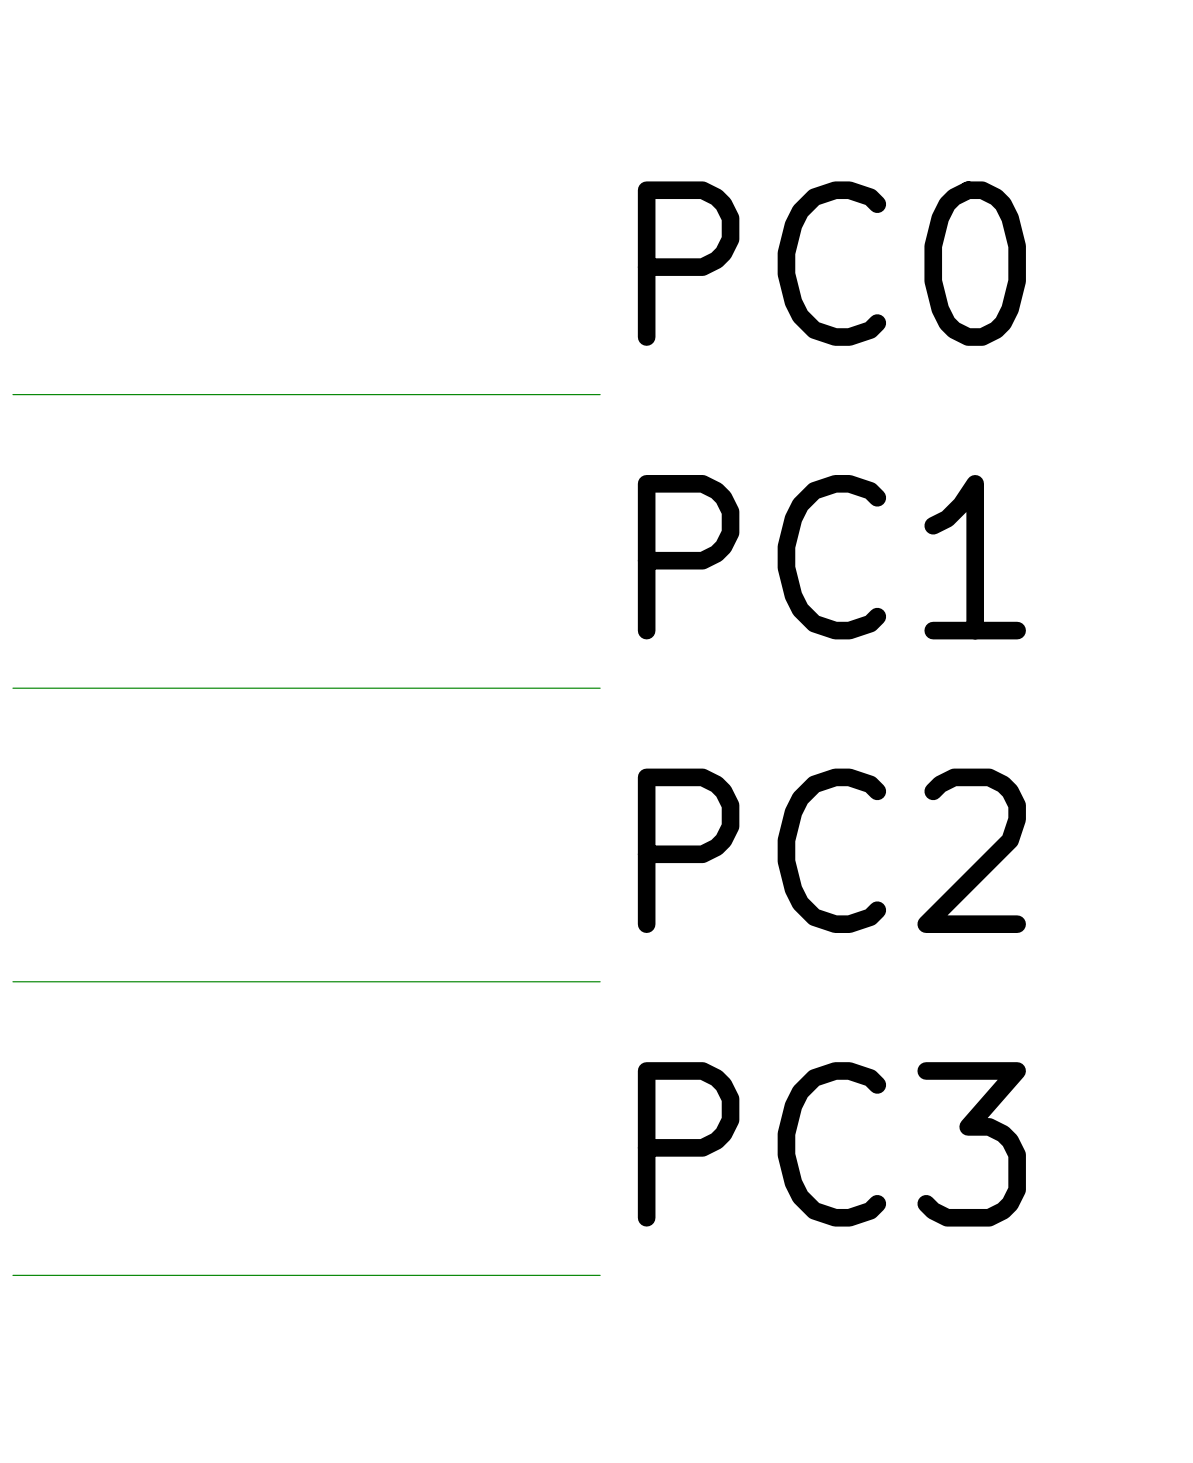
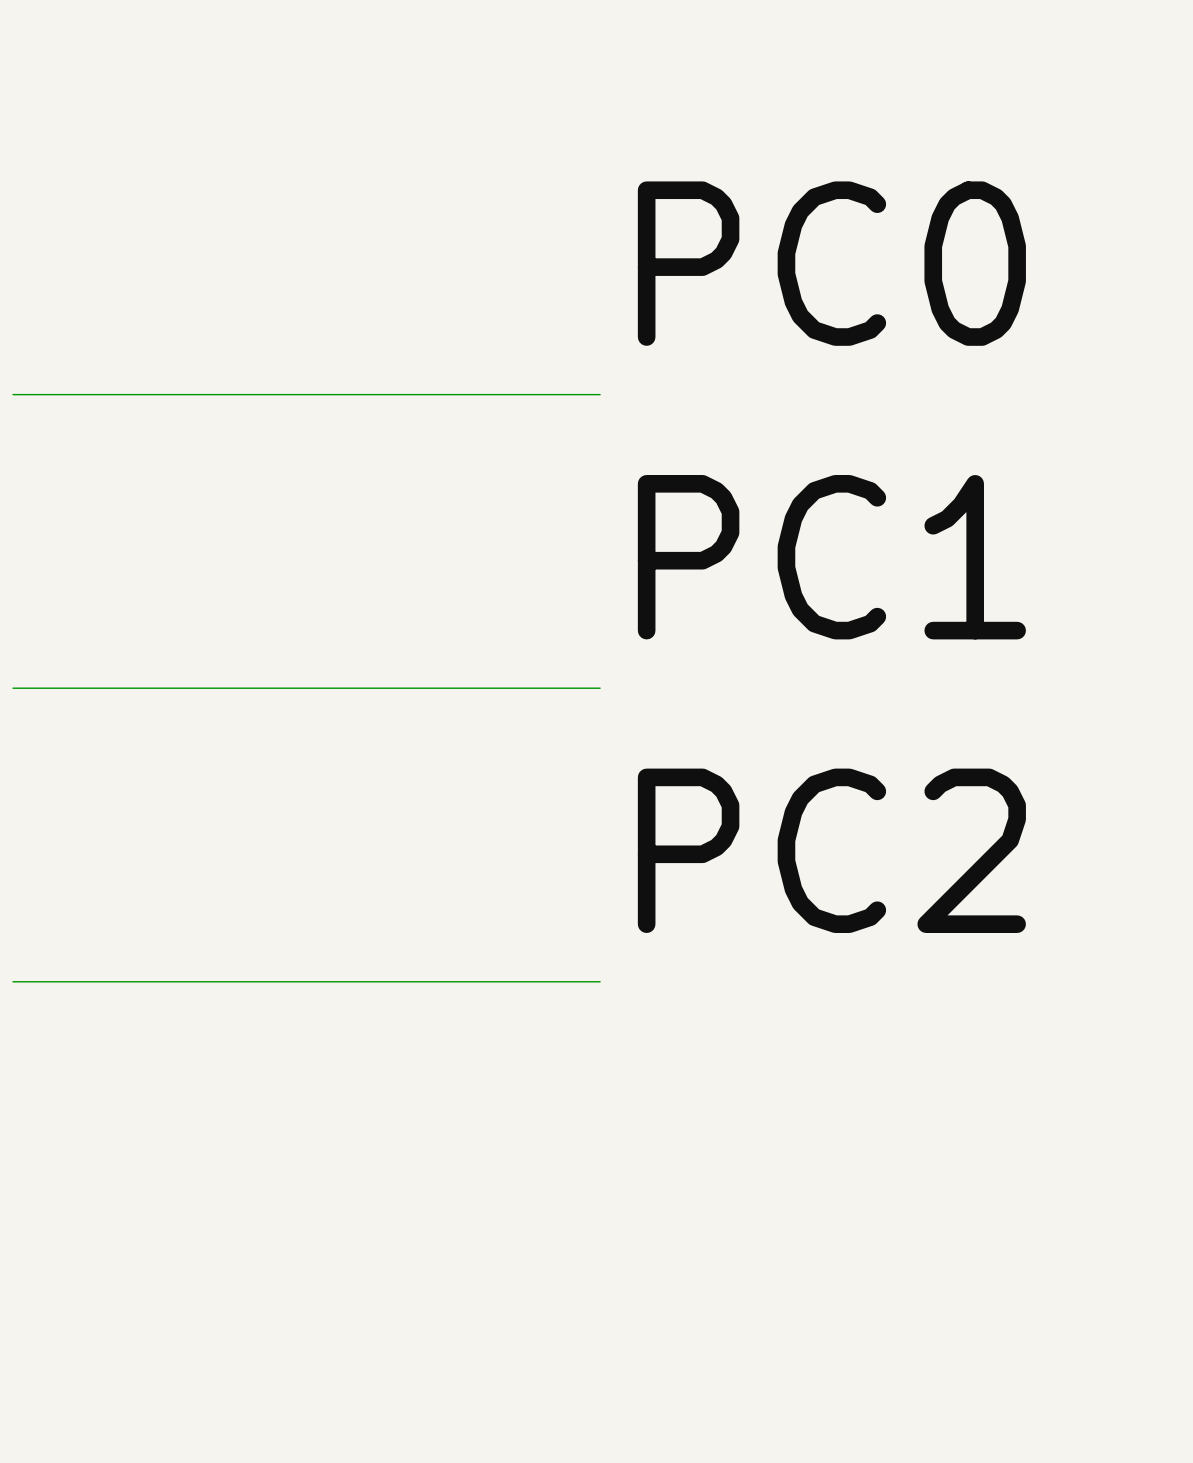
label: PC3 (831, 1144) -> none
wire: (12, 1275) (600, 1275) -> none

